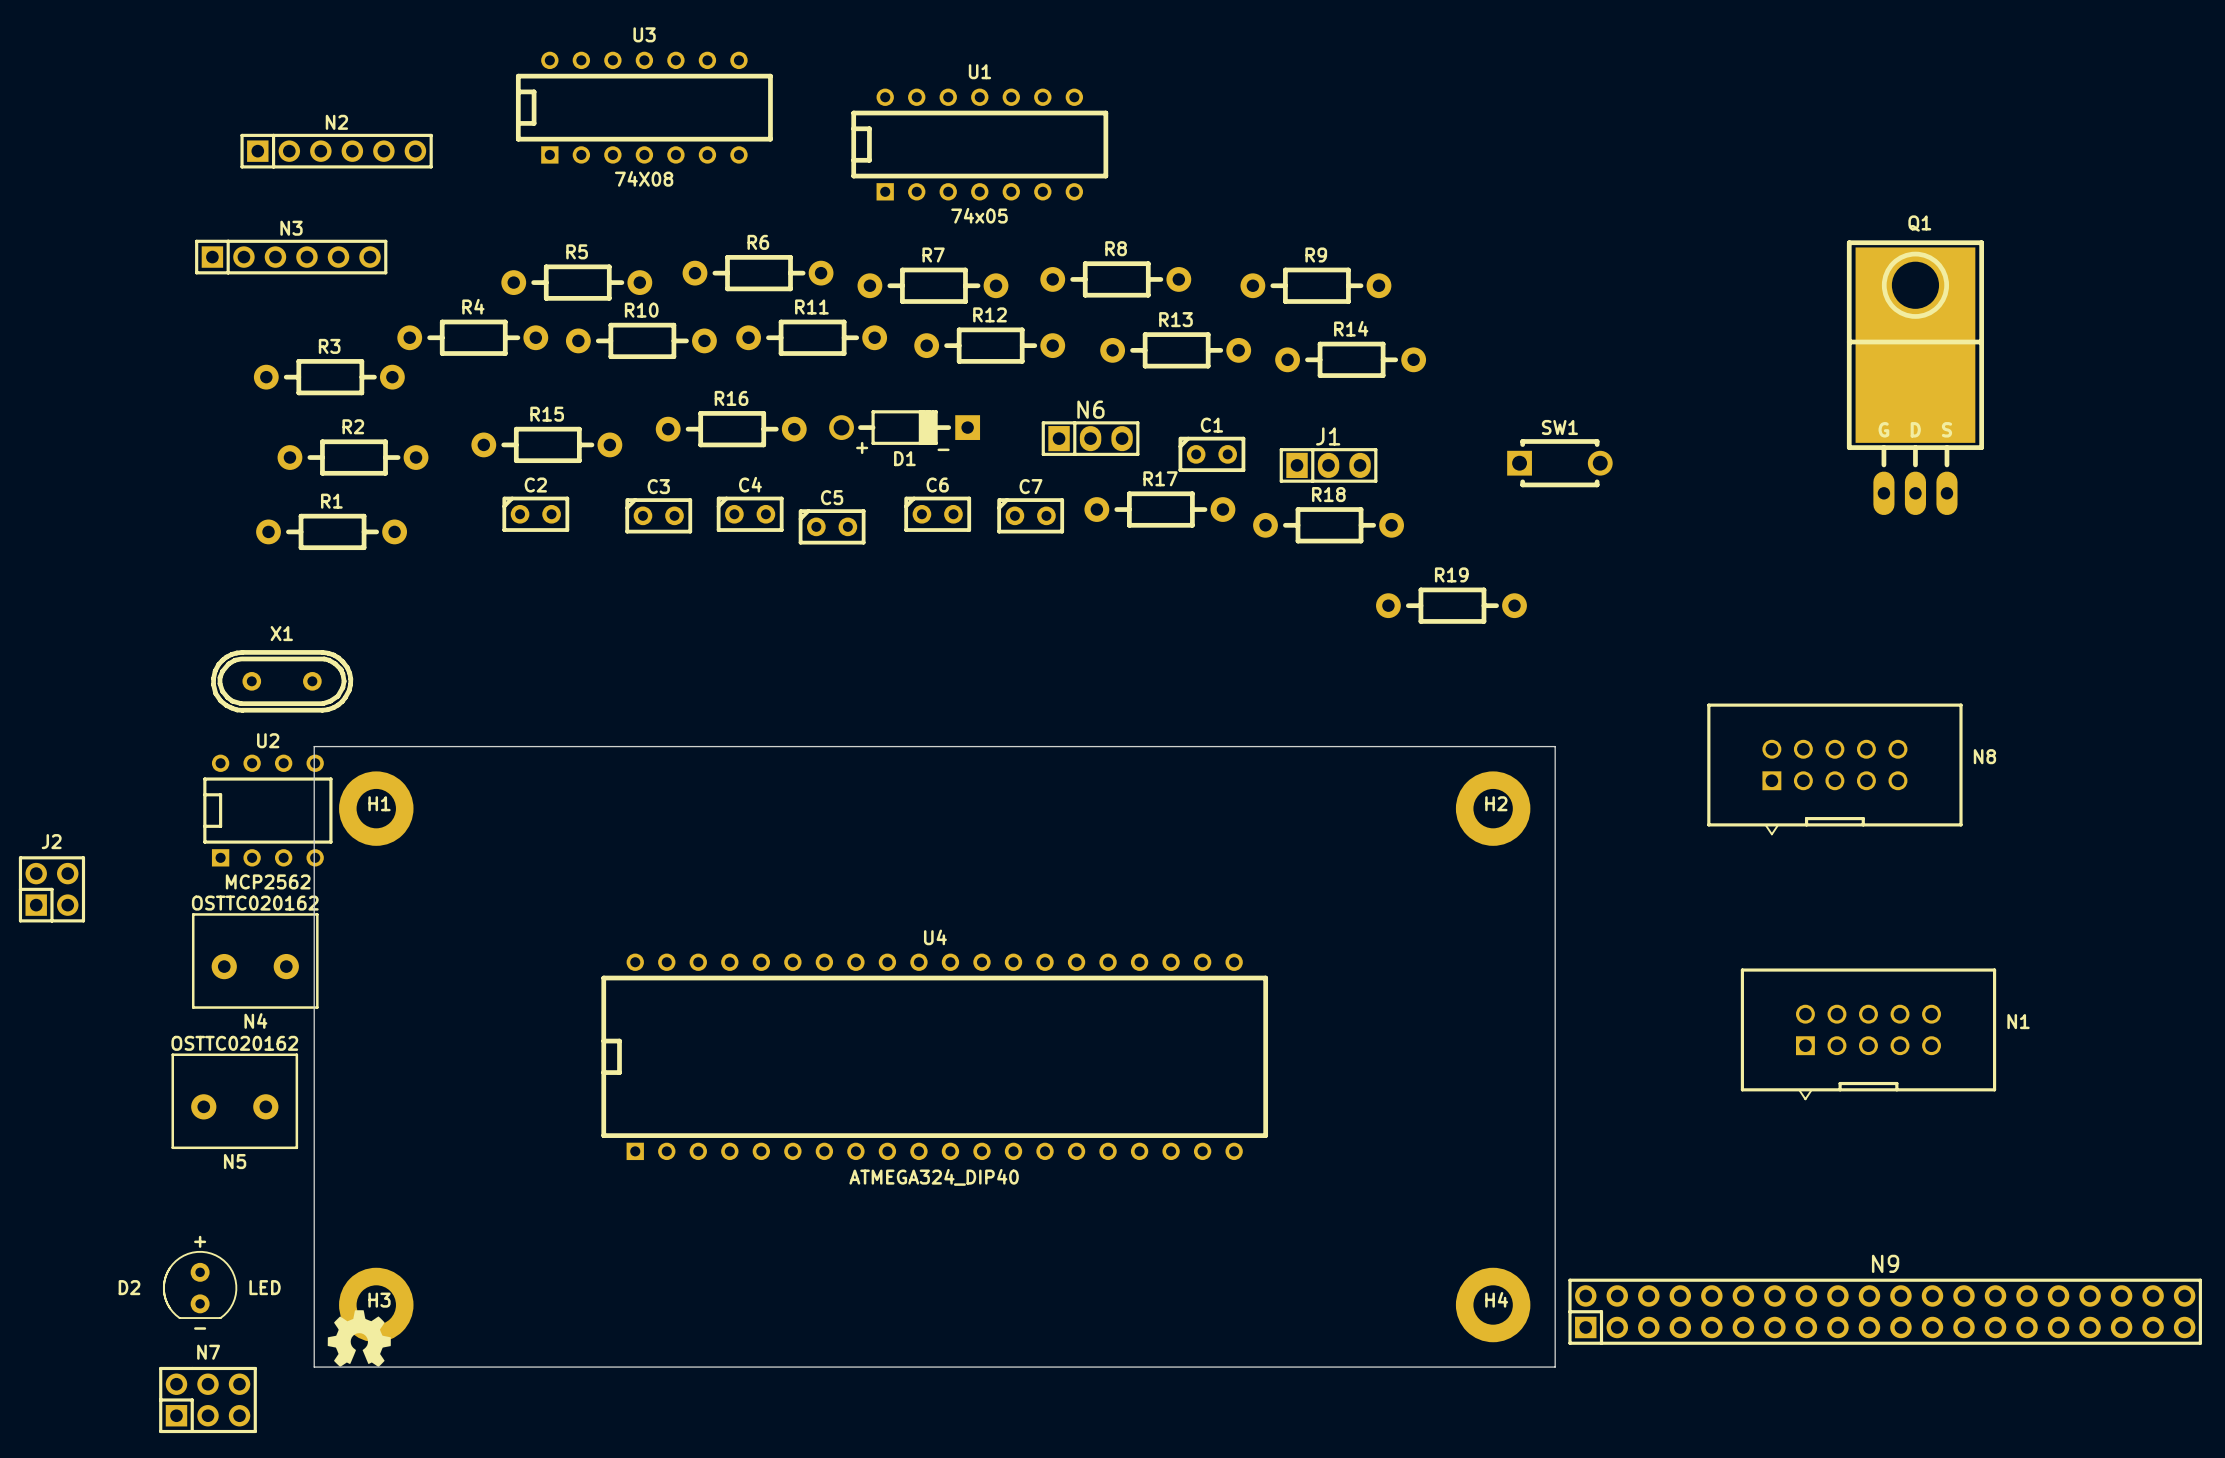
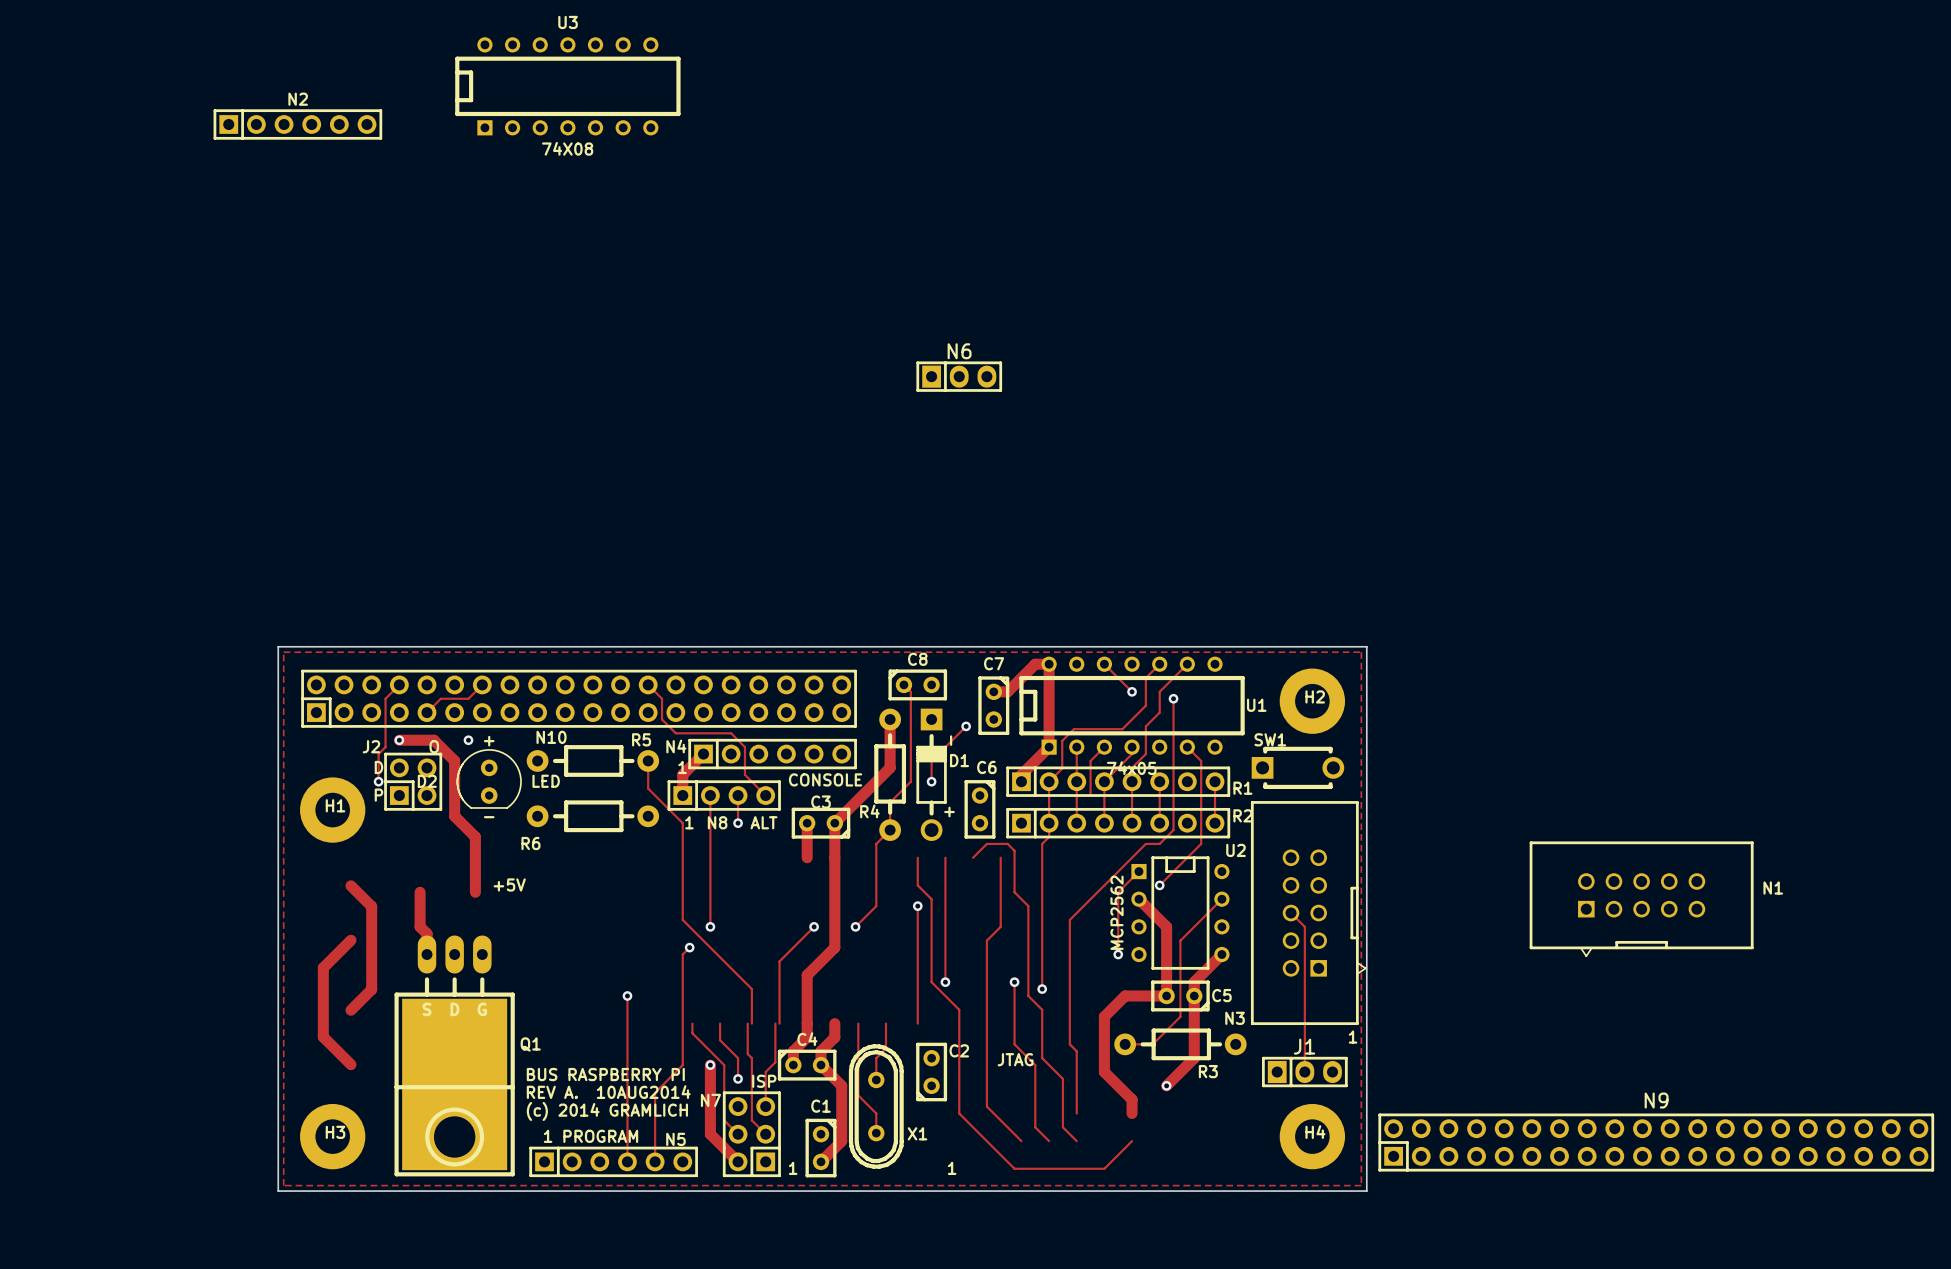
U1 name position: U1 (979, 71) -> U1 (1256, 705)
U1 position: (979, 144) -> (1132, 705)
Q1 name position: Q1 (1919, 223) -> Q1 (530, 1044)
N3 name position: N3 (291, 228) -> N3 (1235, 1018)
N3 footprint: [195, 239, 388, 275] -> [1250, 801, 1367, 1026]
R6 name position: R6 (758, 242) -> R6 (530, 843)
R5 name position: R5 (577, 251) -> R5 (641, 739)
R6 position: (758, 273) -> (592, 816)
R8: (1115, 279) -> none
R5 position: (576, 282) -> (592, 760)
R7: (932, 285) -> none
R9: (1315, 285) -> none
R4 name position: R4 (473, 306) -> R4 (869, 811)
R4 rotation: 0° (472, 337) -> 90° counterclockwise (890, 774)
R4 position: (472, 337) -> (890, 774)
R11: (811, 337) -> none
R10: (641, 340) -> none
R12: (989, 345) -> none
R3 name position: R3 (329, 346) -> R3 (1208, 1071)
R13: (1175, 350) -> none
R14: (1350, 359) -> none
R3 position: (329, 377) -> (1180, 1044)
Q1 rotation: 0° (1915, 377) -> 180° (454, 1055)
Q1 position: (1915, 377) -> (454, 1055)
R2 name position: R2 (353, 426) -> R2 (1242, 815)
D1 rotation: 0° (904, 427) -> 90° counterclockwise (931, 774)
D1 position: (904, 427) -> (931, 774)
SW1 name position: SW1 (1559, 427) -> SW1 (1270, 739)
R16: (731, 429) -> none
R2 footprint: [277, 439, 429, 476] -> [1006, 807, 1231, 839]
R15: (546, 444) -> none
C1 rotation: 0° (1211, 454) -> 90° clockwise (821, 1148)
C1 position: (1211, 454) -> (821, 1148)
SW1 position: (1559, 463) -> (1297, 767)
J1 position: (1328, 465) -> (1304, 1072)
C2 name position: C2 (535, 485) -> C2 (959, 1050)
C5 name position: C5 (832, 497) -> C5 (1221, 995)
R1 name position: R1 (331, 501) -> R1 (1242, 788)
R17: (1159, 509) -> none
R1 footprint: [256, 513, 408, 551] -> [1006, 766, 1231, 797]
C2 rotation: 0° (535, 514) -> 90° counterclockwise (931, 1072)
C2 position: (535, 514) -> (931, 1072)
C4 position: (750, 514) -> (807, 1065)
C6 rotation: 0° (937, 514) -> 90° clockwise (979, 809)
C6 position: (937, 514) -> (979, 809)
C3 rotation: 0° (658, 515) -> 180° (821, 823)
C3 position: (658, 515) -> (821, 823)
C7 rotation: 0° (1030, 515) -> 90° clockwise (993, 705)
C7 position: (1030, 515) -> (993, 705)
R18: (1328, 525) -> none
C5 rotation: 0° (832, 526) -> 180° (1180, 995)
C5 position: (832, 526) -> (1180, 995)
R19: (1451, 605) -> none
X1 name position: X1 (281, 633) -> X1 (917, 1133)
X1 rotation: 0° (282, 681) -> 90° counterclockwise (876, 1106)
X1 position: (282, 681) -> (876, 1106)
N8 footprint: [1707, 703, 1963, 836] -> [667, 780, 781, 811]
U2 name position: U2 (268, 740) -> U2 (1236, 850)
zone outline: none -> (283, 652) (283, 1185) (1361, 1185) (1361, 652) (283, 652)
N8 name position: N8 (1984, 756) -> N8 (717, 822)
track: none -> (1104, 664) (1132, 691)
track: none -> (1159, 664) (1145, 678) (1145, 705) (1122, 729) (1073, 729) (1062, 740) (1062, 768) (1049, 781) (1049, 837) (1042, 843) (1042, 989)
track: none -> (1187, 664) (1159, 691) (1159, 712) (1145, 726) (1145, 754) (1132, 767) (1132, 823)
track: none -> (399, 684) (385, 698) (385, 747) (378, 754) (378, 781)
track: none -> (482, 684) (468, 698) (440, 698) (427, 712)
track: none -> (648, 684) (662, 698) (662, 719) (675, 733) (731, 733) (744, 747) (744, 774) (765, 795)
track: none -> (903, 684) (910, 691) (910, 781) (890, 802) (890, 830) (876, 843) (876, 906) (855, 926)
C8: none -> (917, 684)
track: none -> (993, 691) (1007, 691) (1035, 664) (1049, 664) (1049, 747) (1021, 774) (1021, 781)
via: none -> (1132, 691)
N10: none -> (579, 698)
track: none -> (1173, 698) (1173, 830) (1159, 843) (1145, 843) (1069, 919) (1069, 1044) (1076, 1051) (1076, 1113)
via: none -> (1173, 698)
H1 position: (376, 808) -> (332, 810)
U2 rotation: 0° (267, 810) -> 90° clockwise (1180, 913)
U2 position: (267, 810) -> (1180, 913)
track: none -> (890, 719) (890, 767) (834, 823) (834, 947) (807, 975) (807, 1037) (793, 1051) (793, 1065)
track: none -> (966, 726) (931, 760) (931, 781)
via: none -> (966, 726)
J2 name position: J2 (51, 841) -> J2 (371, 746)
track: none -> (399, 740) (433, 740) (454, 760) (454, 816) (475, 837) (475, 892)
via: none -> (399, 740)
via: none -> (468, 740)
text: none -> O (434, 746)
track: none -> (1076, 747) (1076, 823)
track: none -> (1104, 747) (1090, 760) (1090, 795)
track: none -> (1132, 747) (1132, 754) (1104, 781) (1104, 823)
track: none -> (1187, 747) (1201, 760) (1201, 843) (1159, 885)
track: none -> (703, 754) (682, 774) (682, 795)
track: none -> (648, 760) (648, 788) (682, 823) (682, 919) (751, 989) (751, 1023)
text: none -> D (378, 767)
text: none -> 1 (682, 767)
J2 position: (51, 889) -> (413, 781)
text: none -> CONSOLE (825, 779)
via: none -> (378, 781)
via: none -> (931, 781)
track: none -> (1159, 781) (1159, 823)
track: none -> (1215, 781) (1215, 823)
N4 value: OSTTC020162 (255, 903) -> none
N4 footprint: [191, 913, 319, 1009] -> [688, 738, 857, 770]
text: none -> P (378, 795)
track: none -> (710, 795) (710, 926)
track: none -> (738, 795) (738, 823)
text: none -> 1 (689, 822)
via: none -> (738, 823)
text: none -> ALT (764, 822)
track: none -> (807, 823) (807, 857)
track: none -> (917, 857) (917, 885) (931, 899) (931, 982) (959, 1009) (959, 1113) (1014, 1168) (1104, 1168) (1132, 1141)
track: none -> (945, 857) (945, 982)
track: none -> (973, 857) (986, 843) (1007, 843) (1014, 850) (1014, 892) (1028, 906) (1028, 995) (1042, 1009) (1042, 1058) (1062, 1078) (1062, 1127) (1076, 1141)
track: none -> (1000, 857) (1000, 926) (986, 940) (986, 1106) (1021, 1141)
track: none -> (1138, 871) (1118, 892) (1118, 954)
text: none -> +5V (509, 884)
via: none -> (1159, 885)
track: none -> (350, 885) (371, 906) (371, 989) (350, 1010)
N4 name position: N4 (255, 1020) -> N4 (676, 746)
track: none -> (420, 892) (420, 926) (427, 933) (427, 954)
track: none -> (1138, 899) (1166, 926) (1166, 995) (1125, 995) (1104, 1016) (1104, 1072) (1132, 1099) (1132, 1113)
track: none -> (1221, 899) (1180, 940) (1180, 1016) (1152, 1044) (1125, 1044)
track: none -> (917, 906) (917, 1023)
via: none -> (917, 906)
N5 value: OSTTC020162 (234, 1043) -> none
track: none -> (1291, 913) (1304, 926) (1304, 1072)
N5 footprint: [171, 1053, 299, 1150] -> [529, 1146, 698, 1178]
U4: ATMEGA324_DIP40 (934, 1056) -> none
via: none -> (710, 926)
track: none -> (814, 926) (779, 961) (779, 1023)
via: none -> (814, 926)
via: none -> (855, 926)
track: none -> (350, 940) (323, 967) (323, 1037) (350, 1064)
track: none -> (689, 947) (682, 954) (682, 1065) (655, 1092) (655, 1161)
via: none -> (689, 947)
via: none -> (1118, 954)
track: none -> (1221, 954) (1194, 982) (1194, 1058) (1166, 1085)
via: none -> (945, 982)
track: none -> (1014, 982) (1014, 1044) (1035, 1065) (1035, 1127) (1049, 1141)
via: none -> (1014, 982)
via: none -> (1042, 989)
track: none -> (627, 995) (627, 1161)
via: none -> (627, 995)
N5 name position: N5 (235, 1161) -> N5 (675, 1139)
track: none -> (692, 1023) (692, 1033) (724, 1065) (724, 1120) (738, 1134)
track: none -> (720, 1023) (720, 1040) (738, 1058) (738, 1078)
track: none -> (747, 1023) (747, 1054) (751, 1058) (751, 1120) (765, 1134)
track: none -> (775, 1023) (775, 1062) (765, 1072) (765, 1106)
track: none -> (834, 1023) (834, 1037) (821, 1051) (821, 1065) (841, 1085) (841, 1141) (821, 1161)
track: none -> (858, 1023) (858, 1095) (876, 1113) (876, 1133)
track: none -> (885, 1023) (885, 1048) (876, 1058) (876, 1080)
text: none -> 1 (1353, 1037)
text: none -> JTAG (1015, 1059)
track: none -> (710, 1065) (710, 1134) (738, 1161)
via: none -> (710, 1065)
text: none -> BUS RASPBERRY PI (605, 1074)
via: none -> (738, 1078)
text: none -> ISP (764, 1081)
via: none -> (1166, 1085)
text: none -> REV A. 10AUG2014 (608, 1092)
text: none -> (c) 2014 GRAMLICH (607, 1111)
D2 position: (200, 1284) -> (489, 778)
text: none -> 1 PROGRAM (591, 1136)
drawing: [327, 1310, 391, 1367] -> none
text: none -> 1 (793, 1168)
text: none -> 1 (952, 1168)
N7 name position: N7 (208, 1352) -> N7 (710, 1100)
N7 rotation: 0° (208, 1399) -> 90° counterclockwise (751, 1134)
N7 position: (208, 1399) -> (751, 1134)

